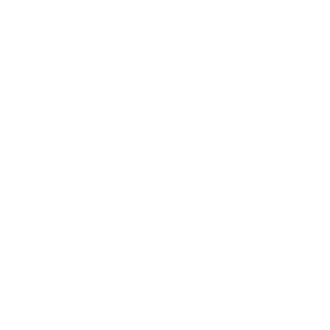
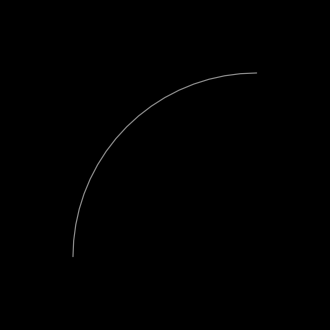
line: none -> (256, 72) (224, 75) (193, 84) (151, 106) (126, 126) (106, 151) (90, 179) (75, 224) (72, 256)

